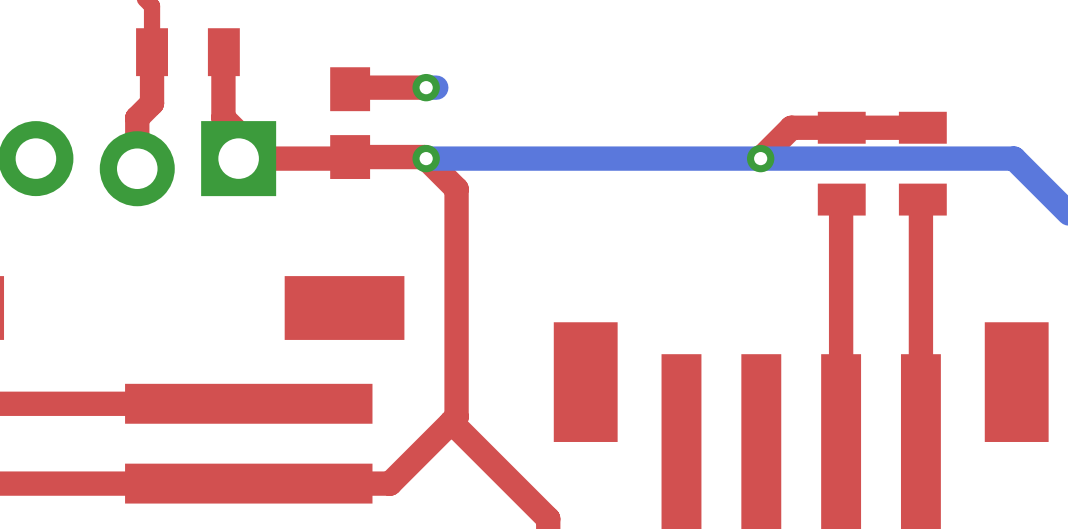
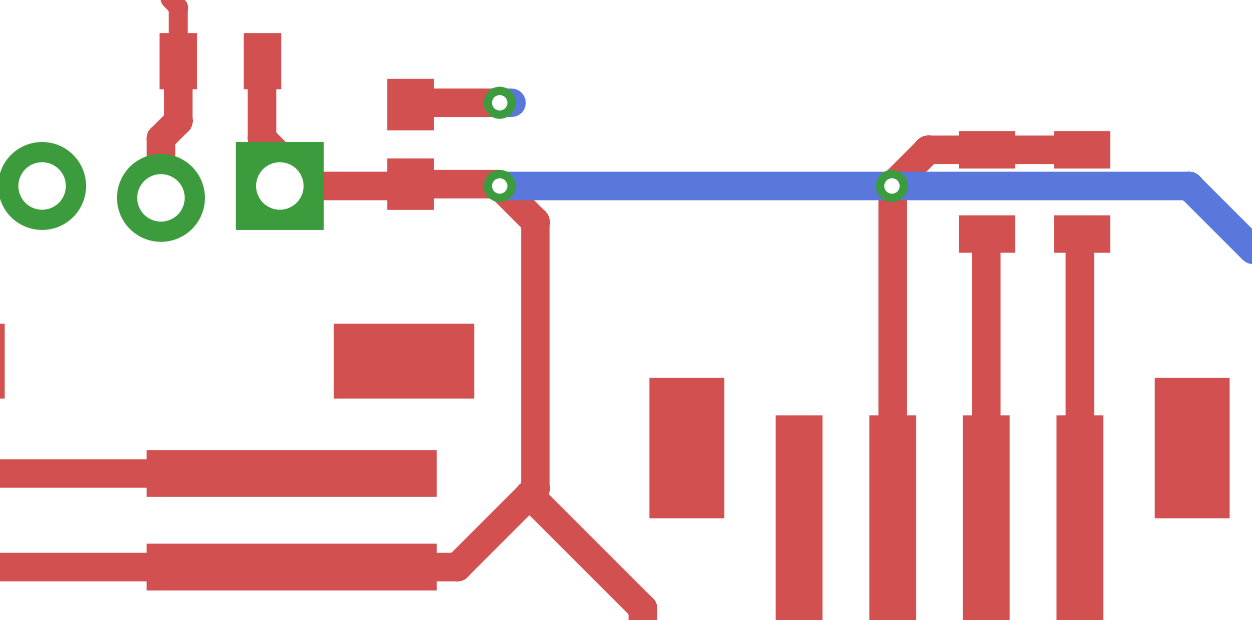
top track: none -> (892, 186) (892, 560)

